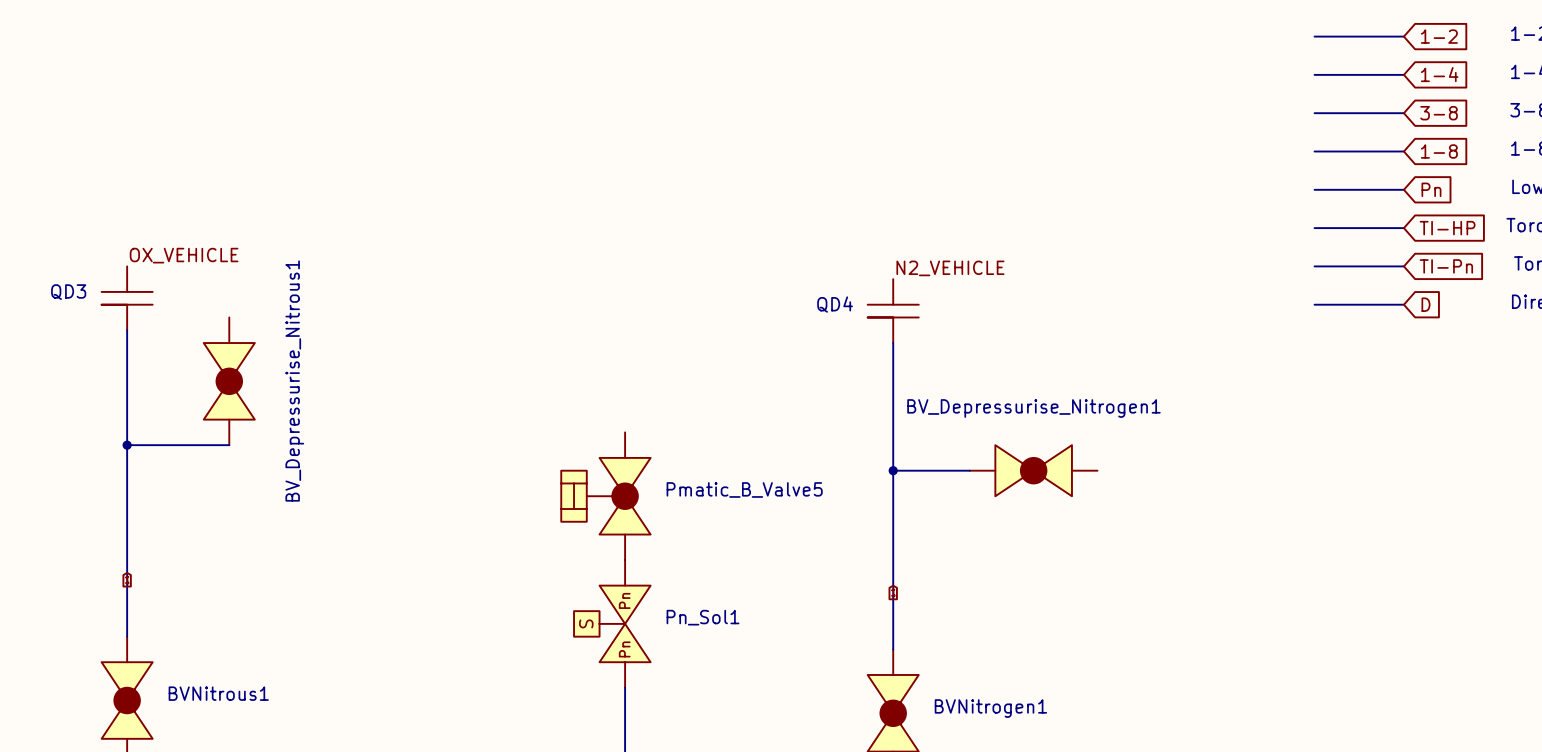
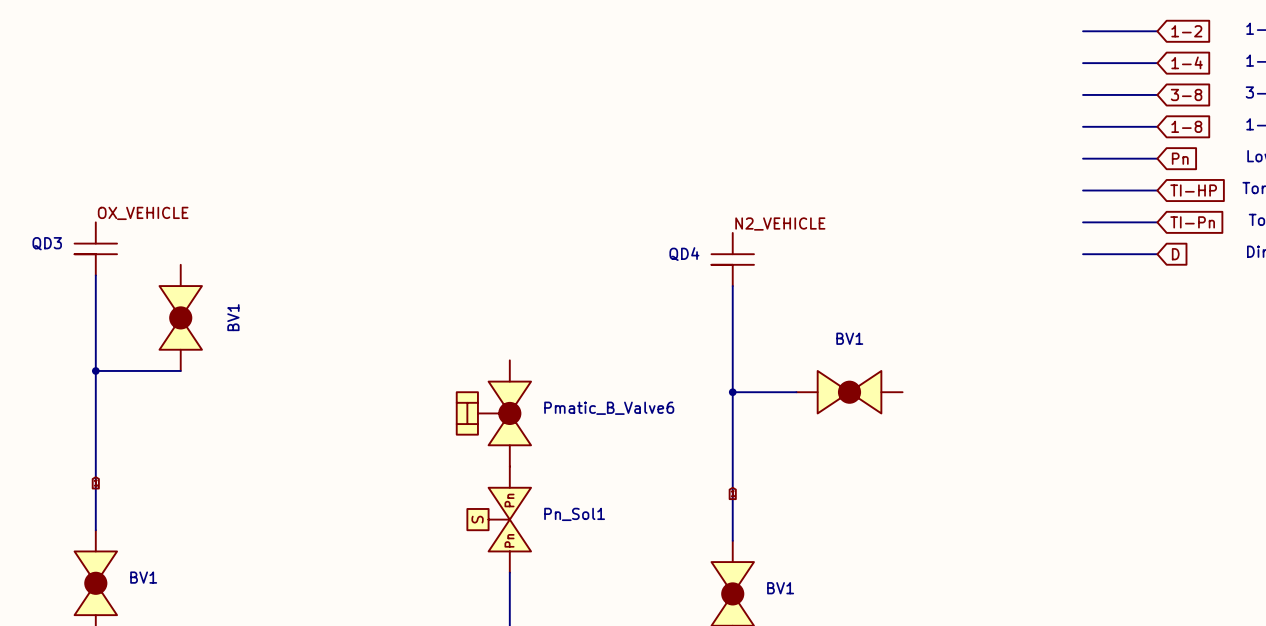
BV_Depressurise_Nitrous1 name: BV_Depressurise_Nitrous1 (294, 381) -> BV1 (233, 317)
BV_Depressurise_Nitrogen1 name: BV_Depressurise_Nitrogen1 (1033, 408) -> BV1 (849, 338)
Pmatic_B_Valve5 name: Pmatic_B_Valve5 (744, 489) -> Pmatic_B_Valve6 (609, 408)
BVNitrous1 name: BVNitrous1 (218, 693) -> BV1 (143, 577)
BVNitrogen1 name: BVNitrogen1 (990, 708) -> BV1 (780, 588)

